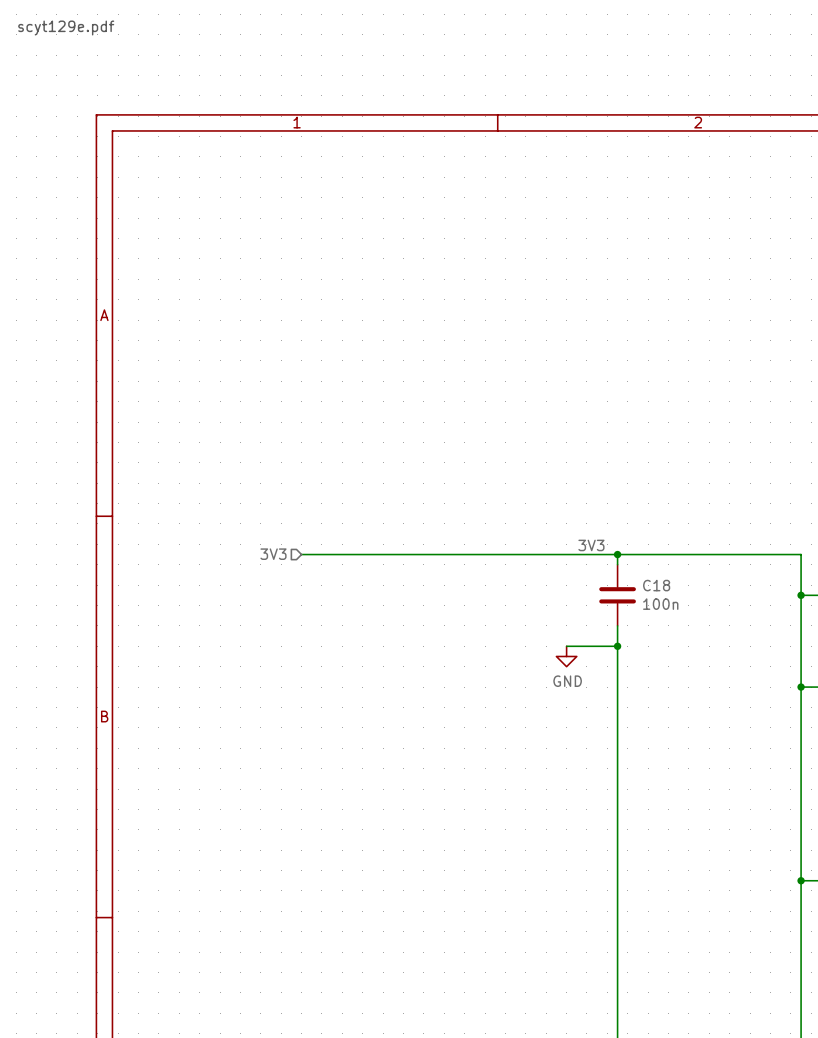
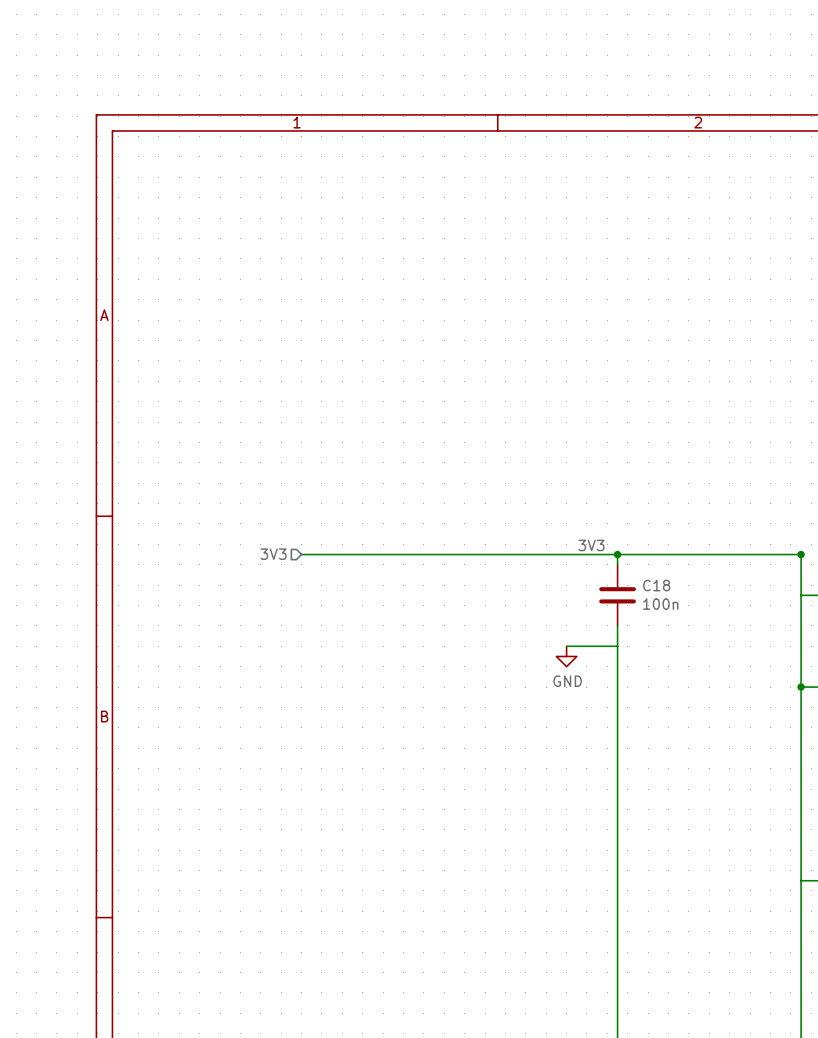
text: scyt129e.pdf (66, 28) -> none
junction: none -> (801, 554)
junction: (801, 595) -> none
junction: (617, 646) -> none
junction: (801, 880) -> none

